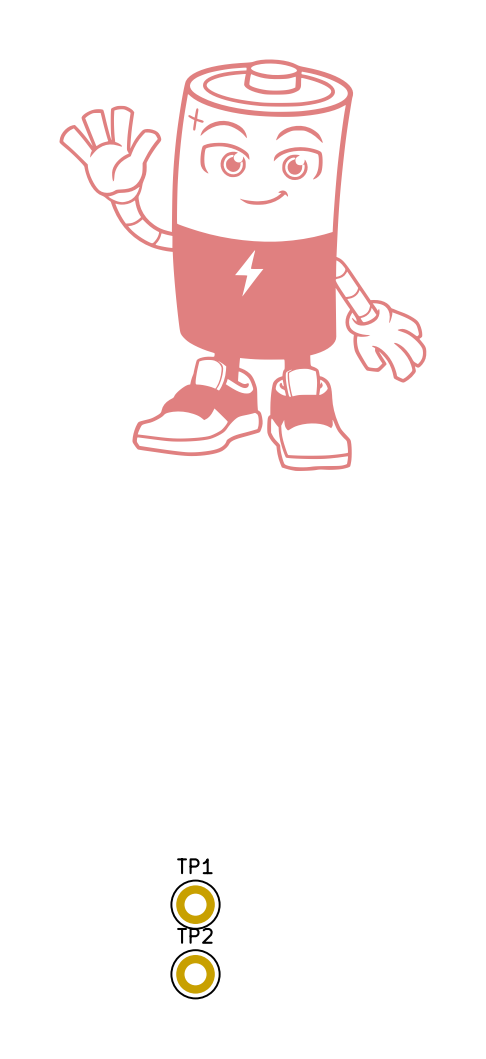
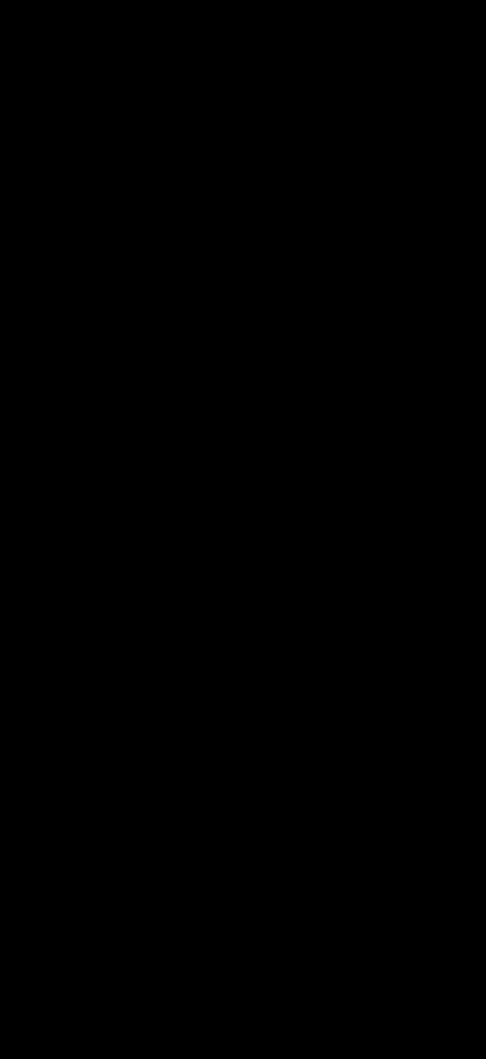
drawing: [59, 59, 427, 471] -> none
TP1: (195, 904) -> none
TP2: (195, 974) -> none

